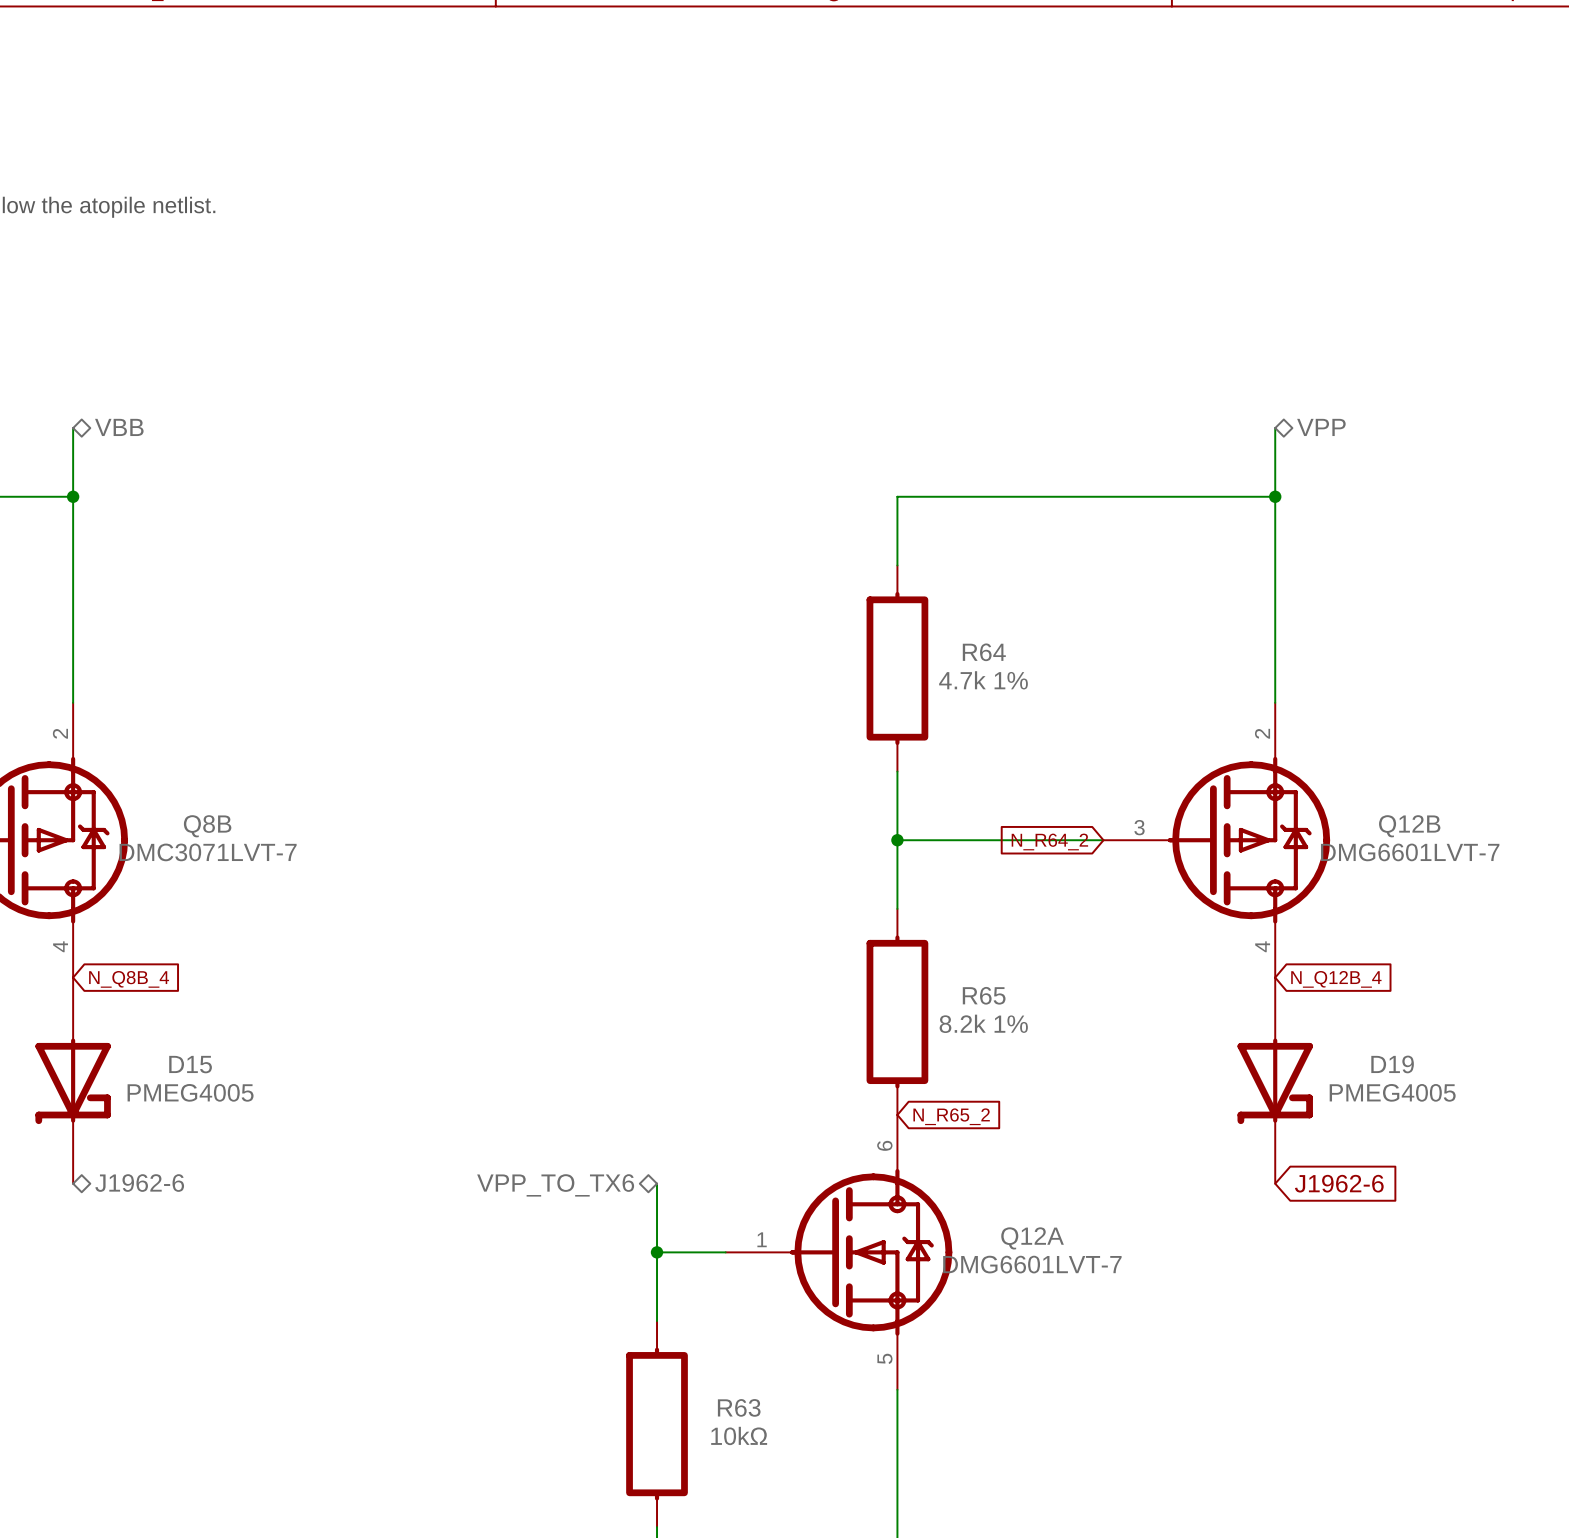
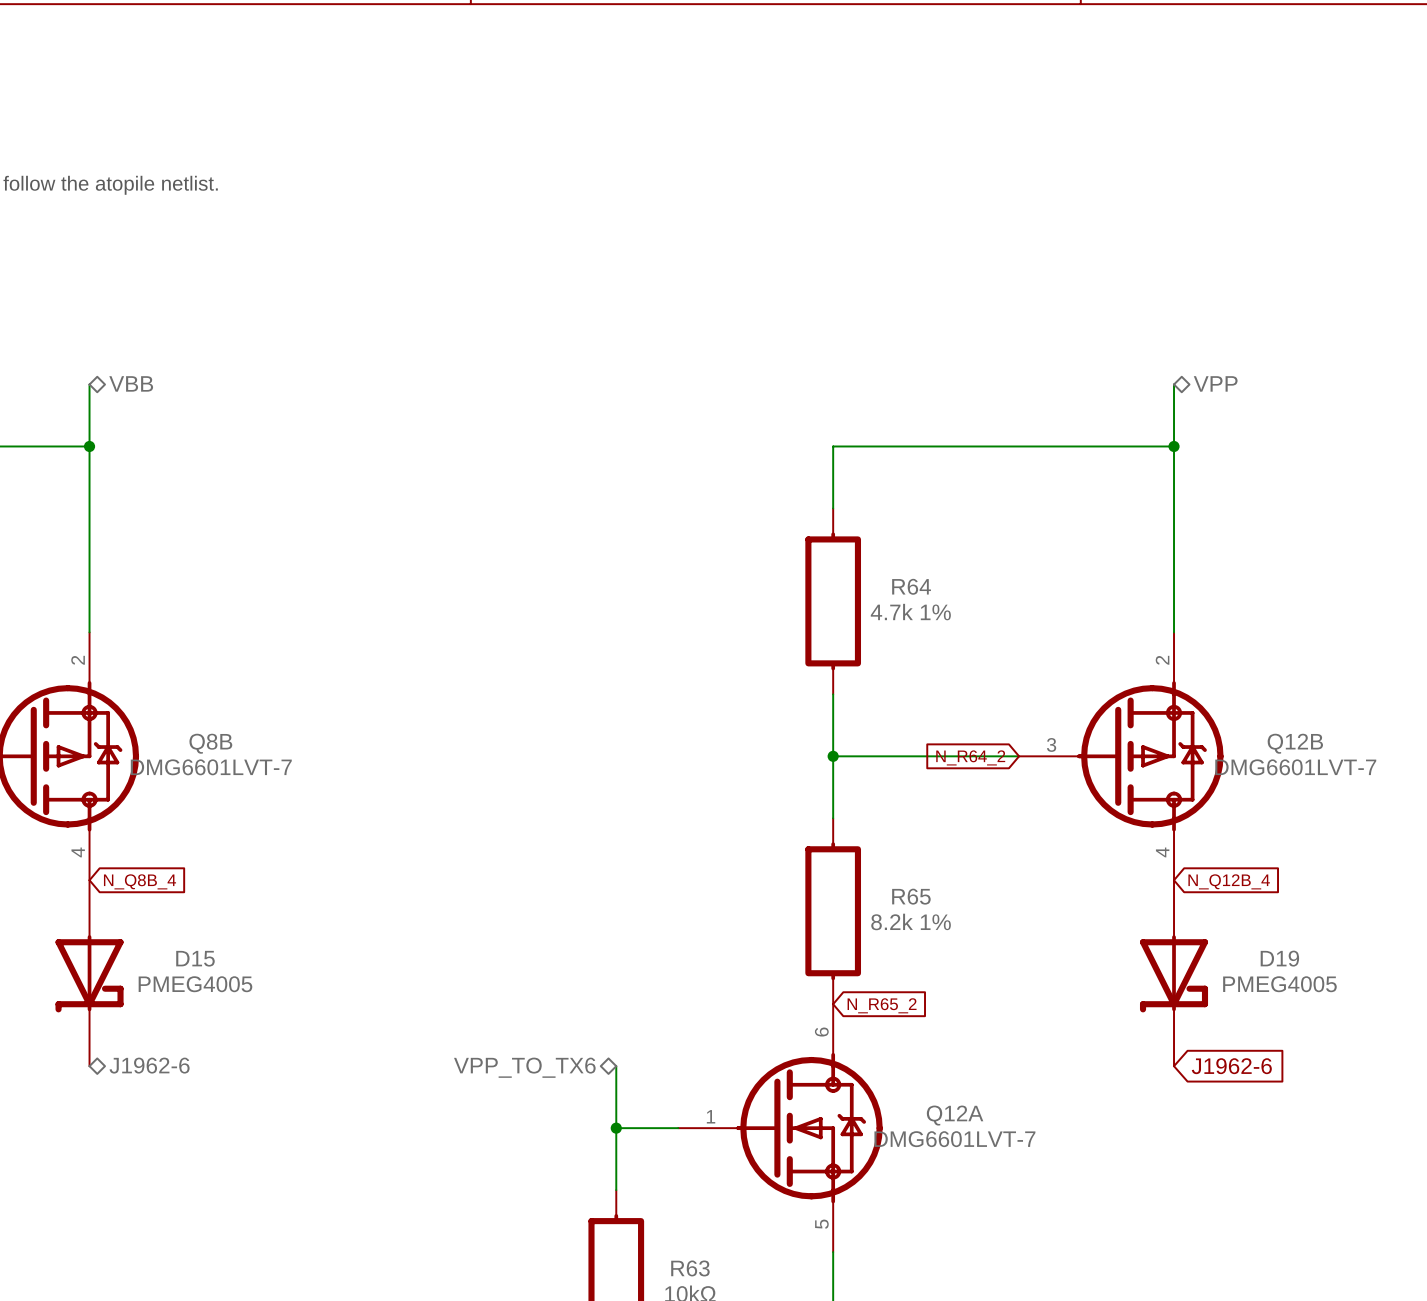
Q8B value: DMC3071LVT-7 (208, 852) -> DMG6601LVT-7 (211, 767)

